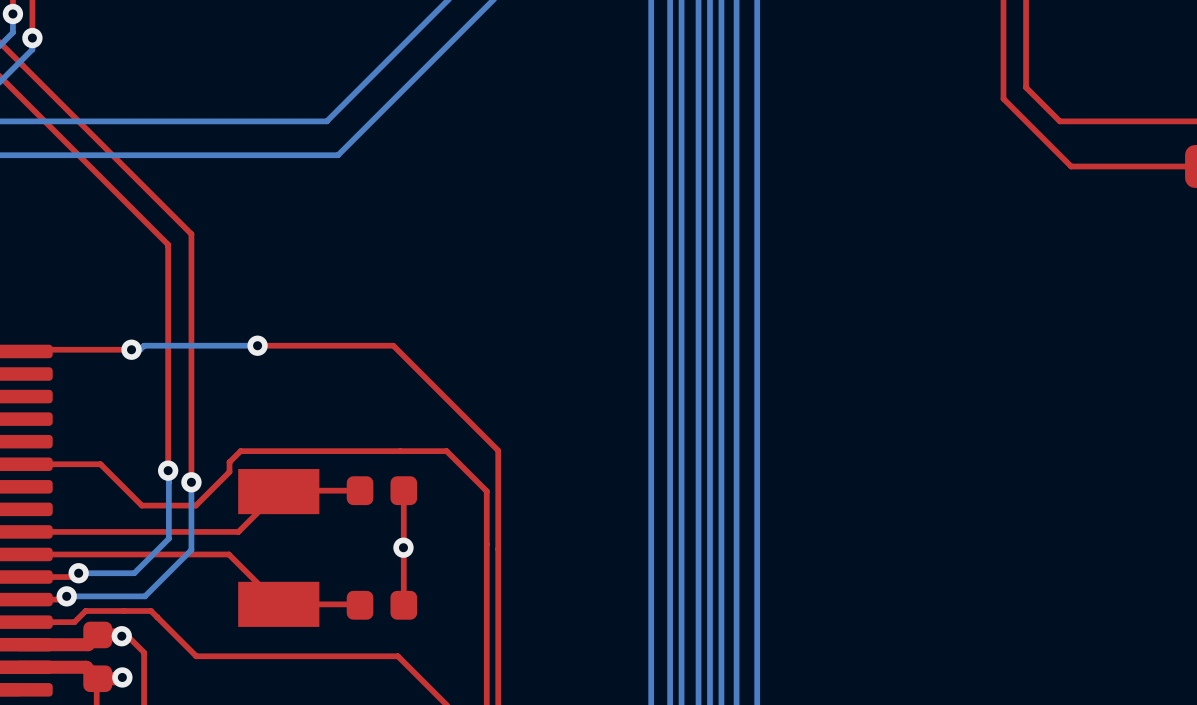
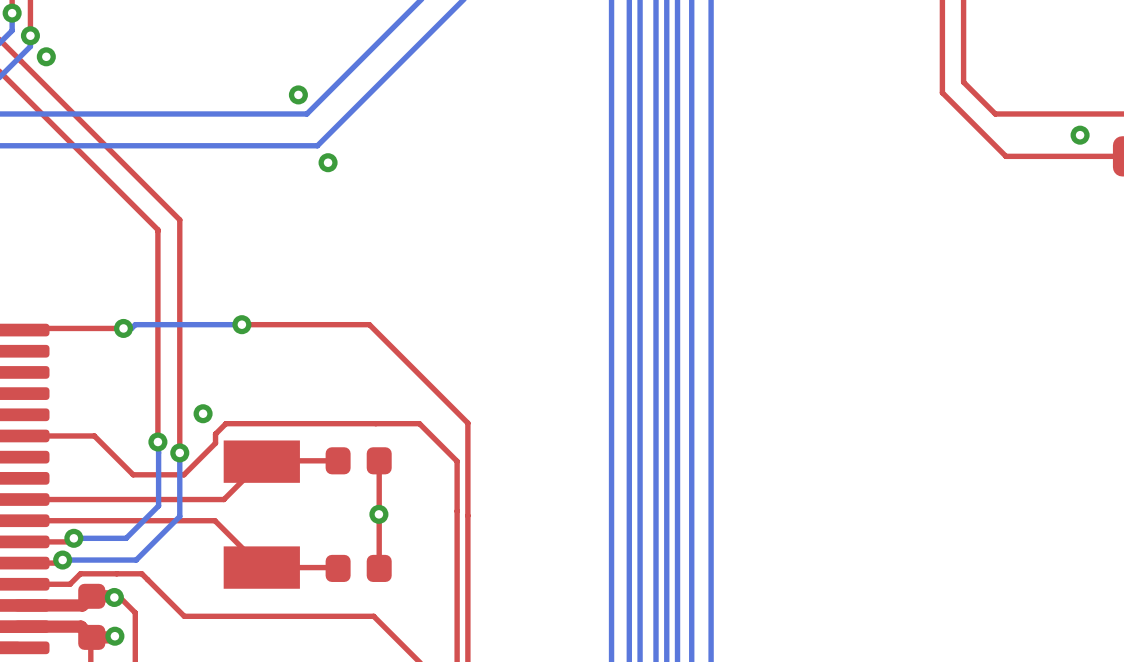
via: none -> (46, 56)
via: none -> (298, 94)
via: none -> (1080, 135)
via: none -> (328, 162)
via: none -> (203, 413)

